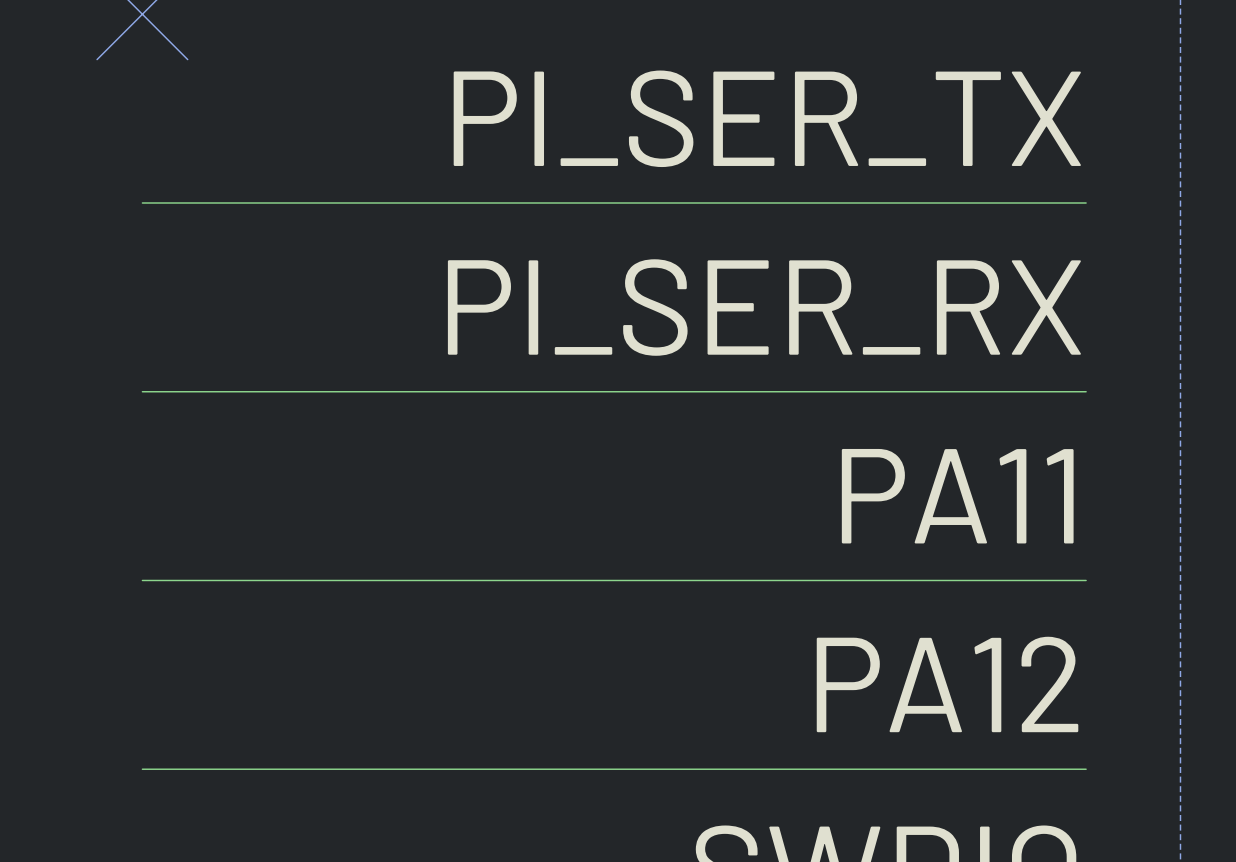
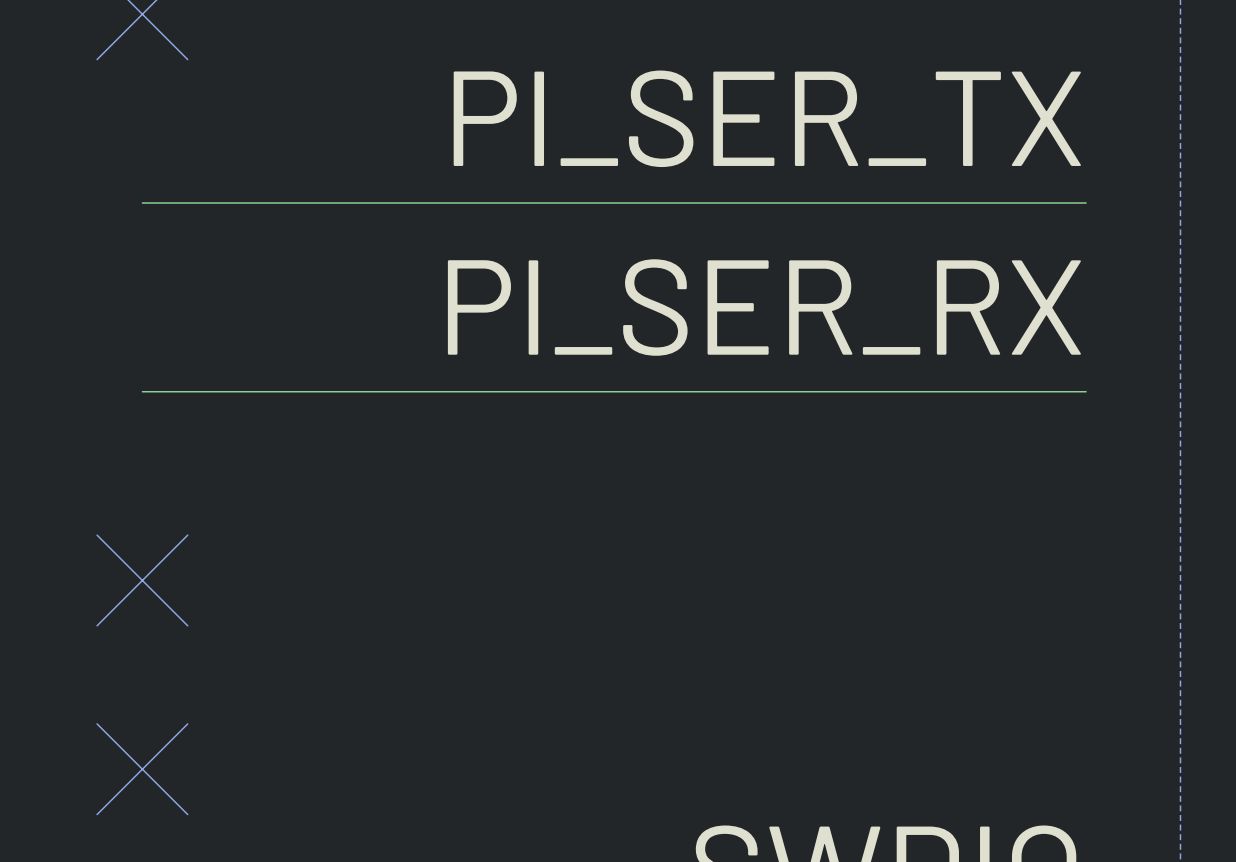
label: PA11 (957, 496) -> none
wire: (142, 580) (1086, 580) -> none
no-connect mark: none -> (142, 580)
label: PA12 (947, 684) -> none
wire: (142, 769) (1086, 769) -> none
no-connect mark: none -> (142, 769)

